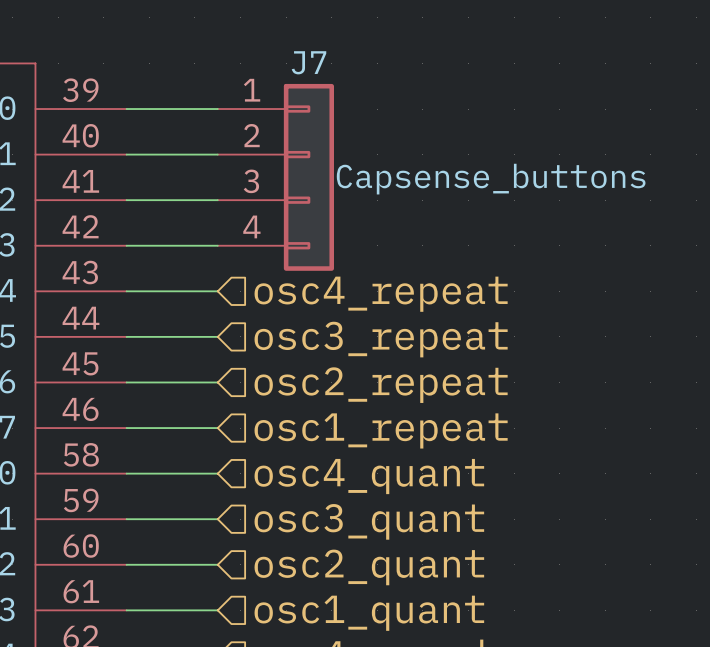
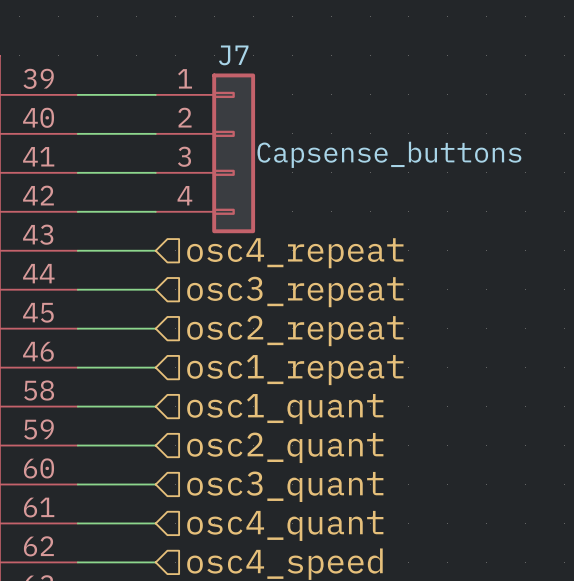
hierarchical label: osc4_quant (369, 476) -> osc1_quant (285, 409)
hierarchical label: osc3_quant (369, 521) -> osc2_quant (285, 447)
hierarchical label: osc2_quant (369, 567) -> osc3_quant (285, 486)
hierarchical label: osc1_quant (369, 613) -> osc4_quant (285, 525)

